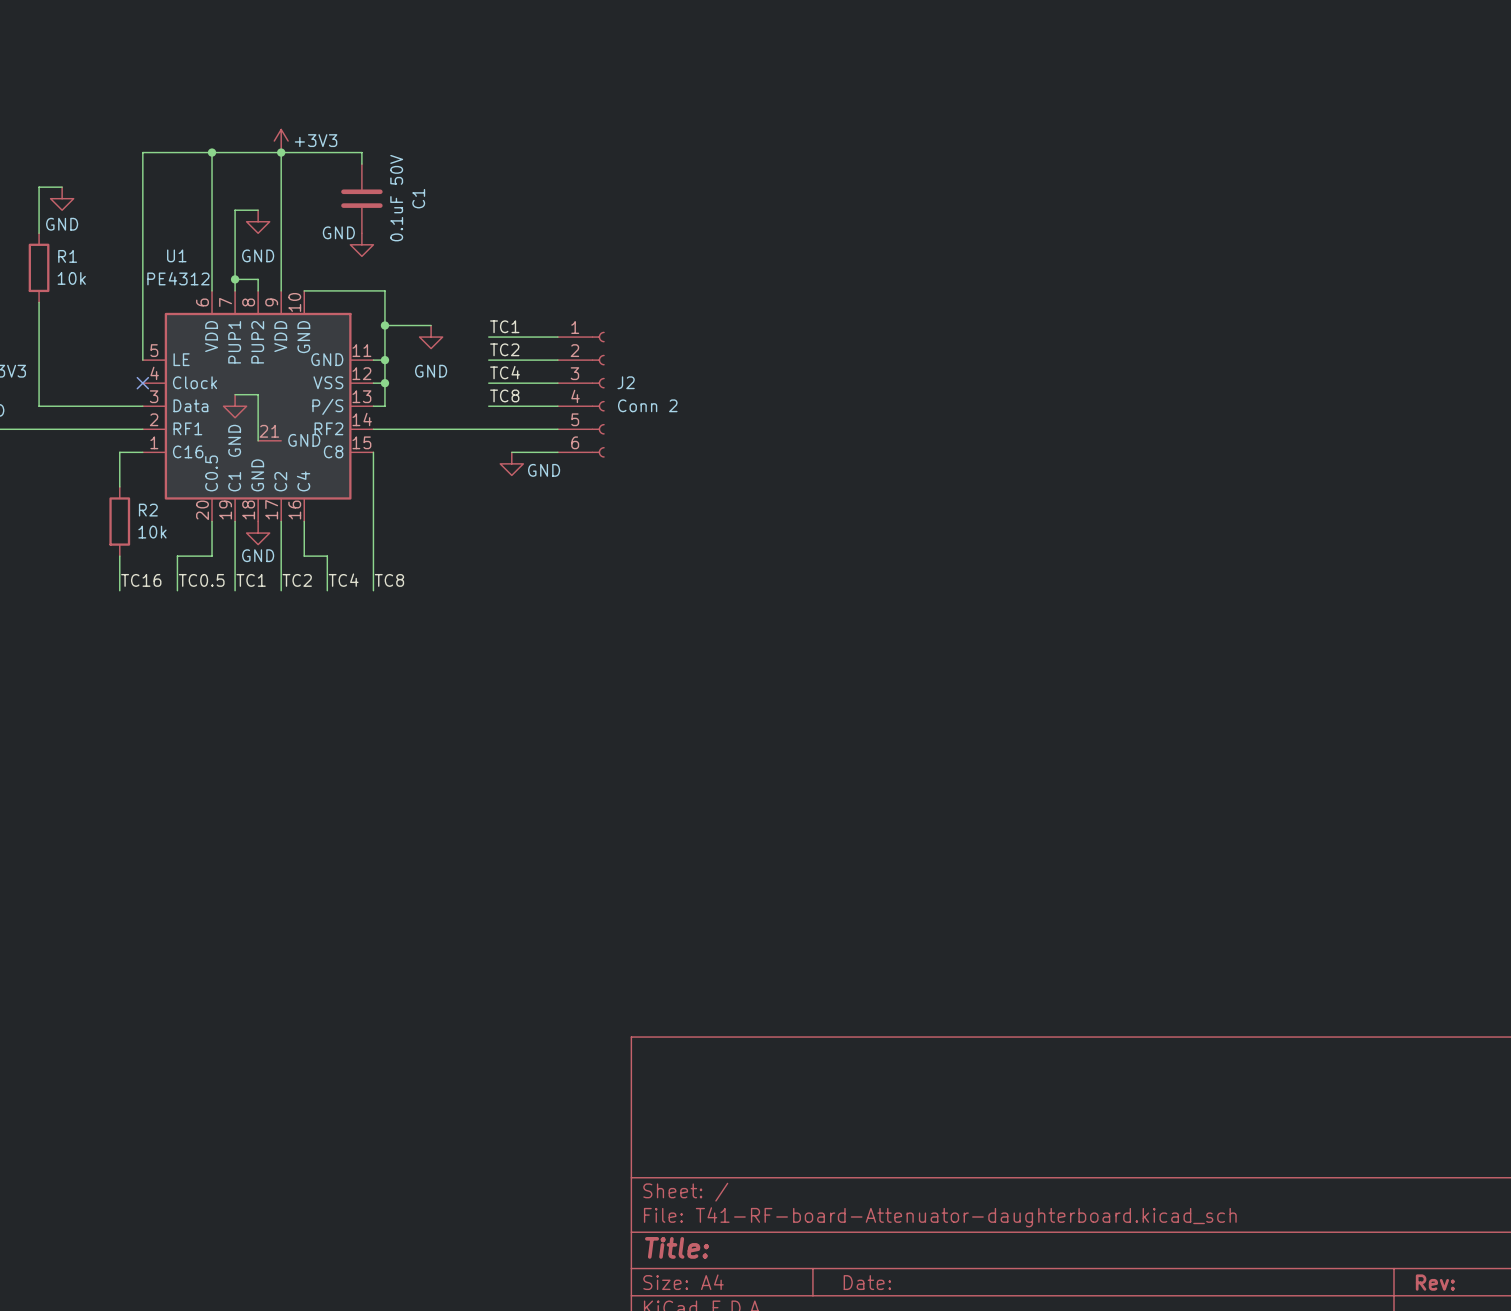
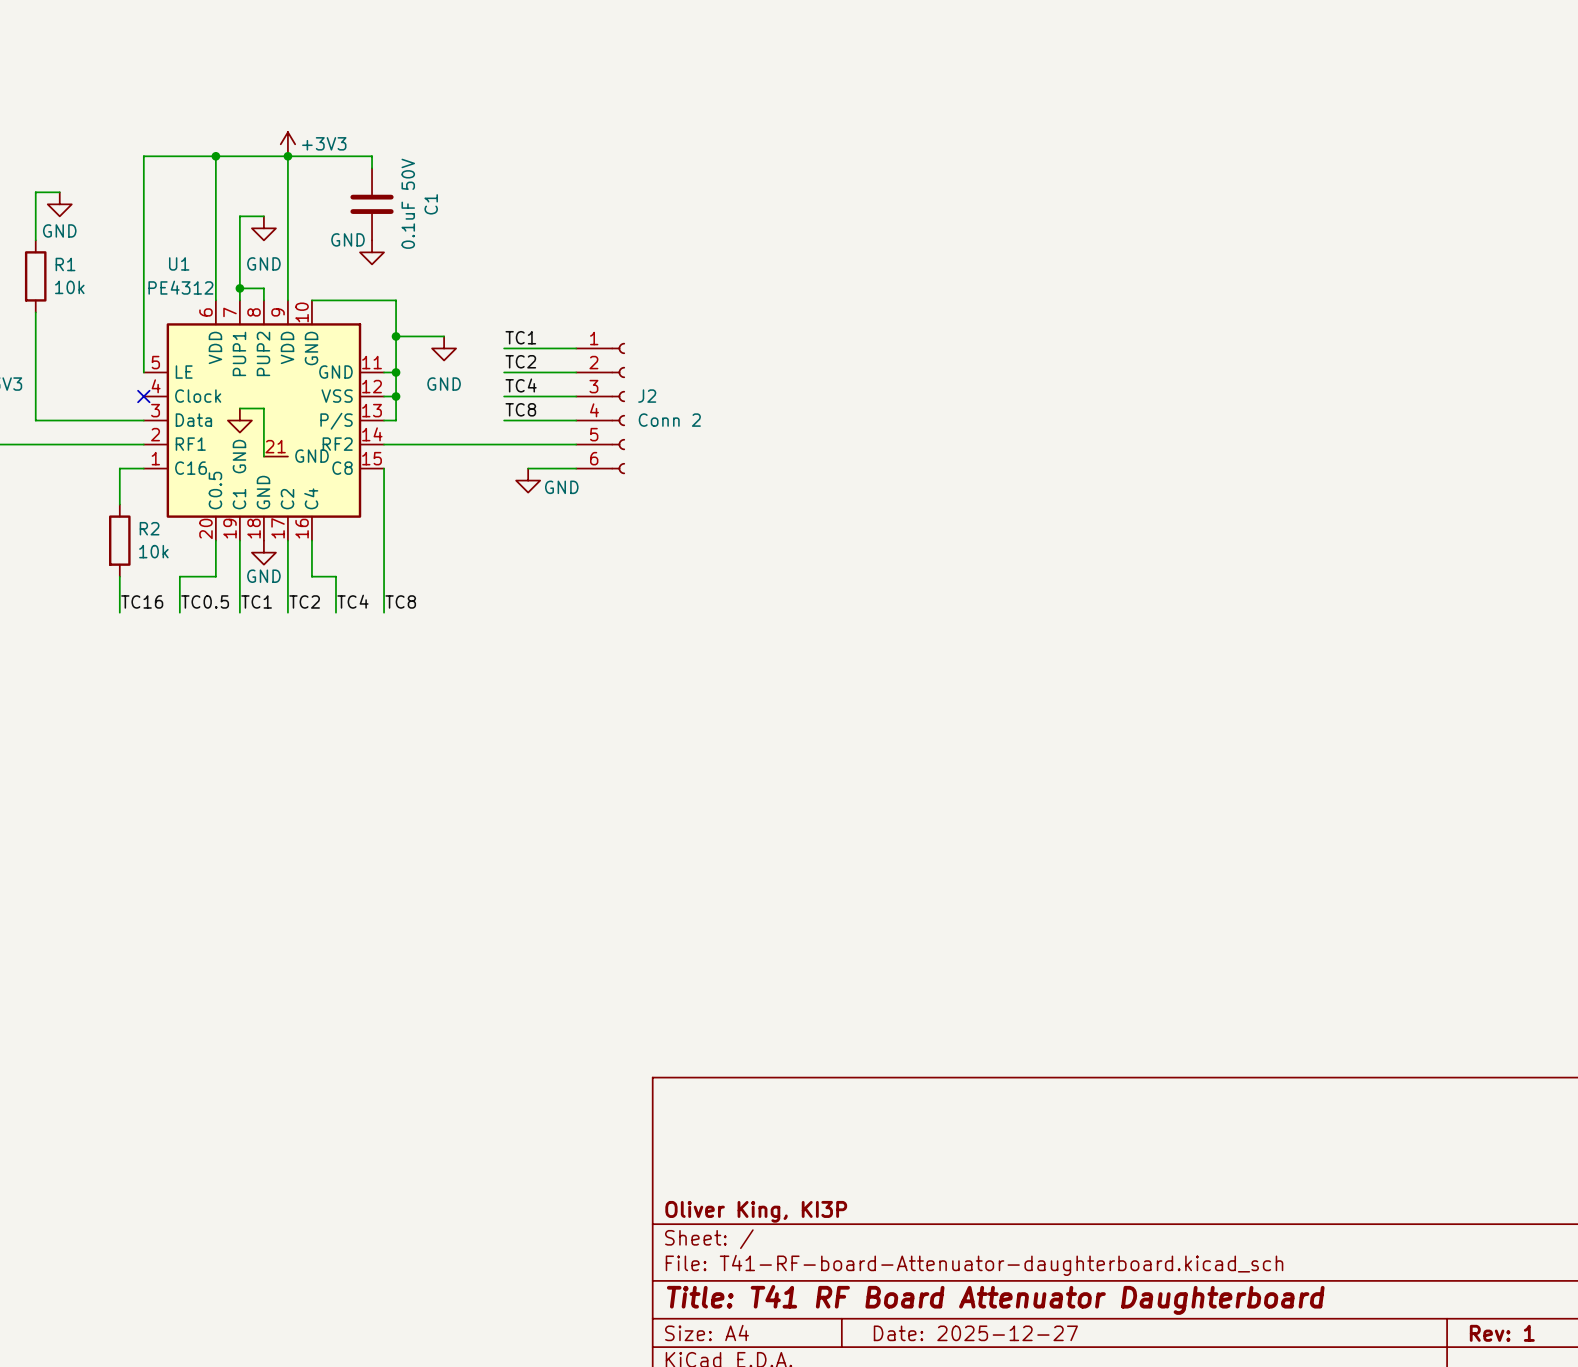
title block: none -> Oliver King, KI3P (756, 1211)
title block: Title: (677, 1247) -> Title: T41 RF Board Attenuator Daughterboard (995, 1299)
title block: Date: (867, 1282) -> Date: 2025-12-27 (975, 1333)
title block: Rev: (1435, 1282) -> Rev: 1 (1502, 1333)

